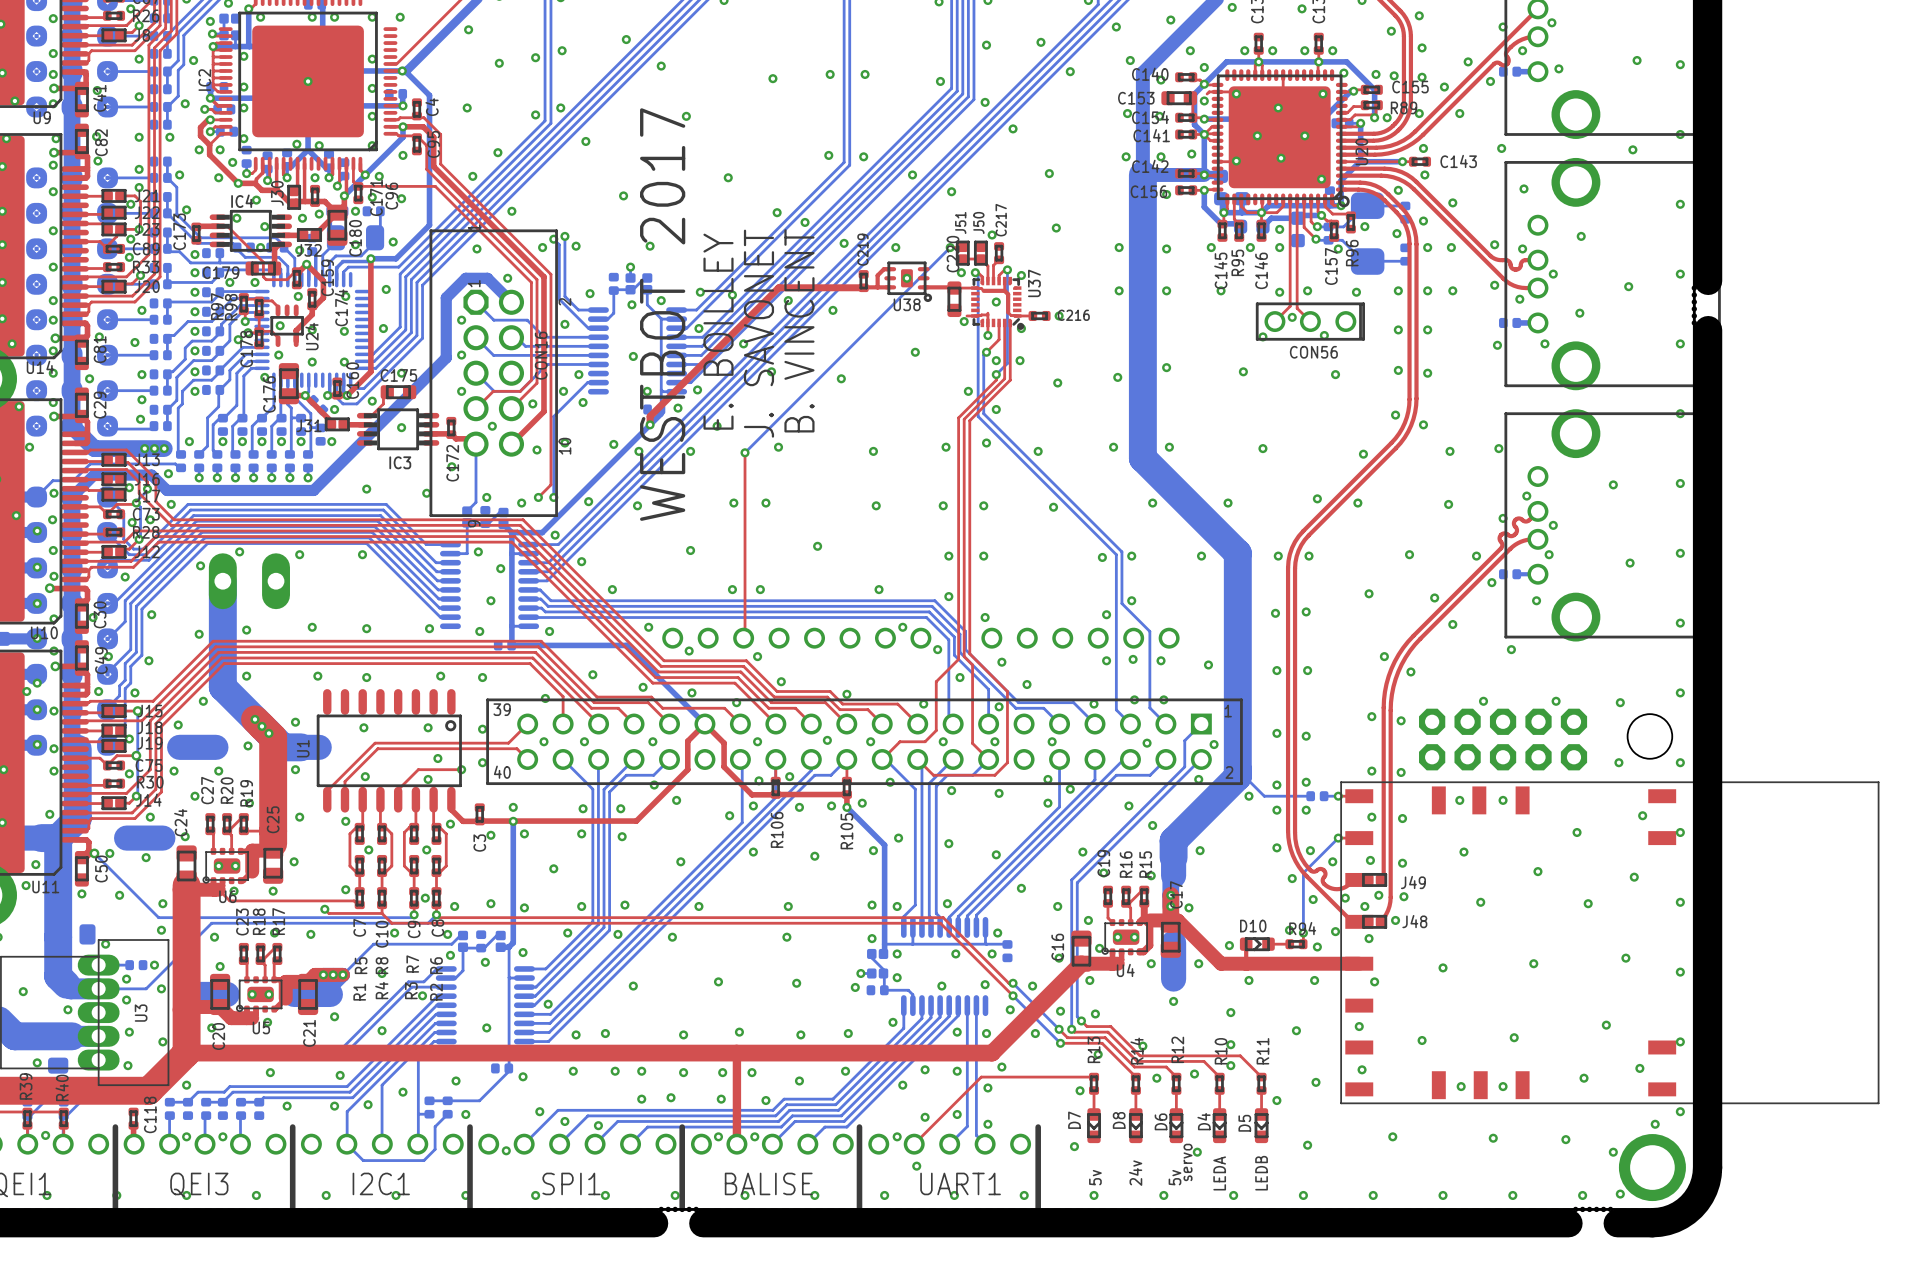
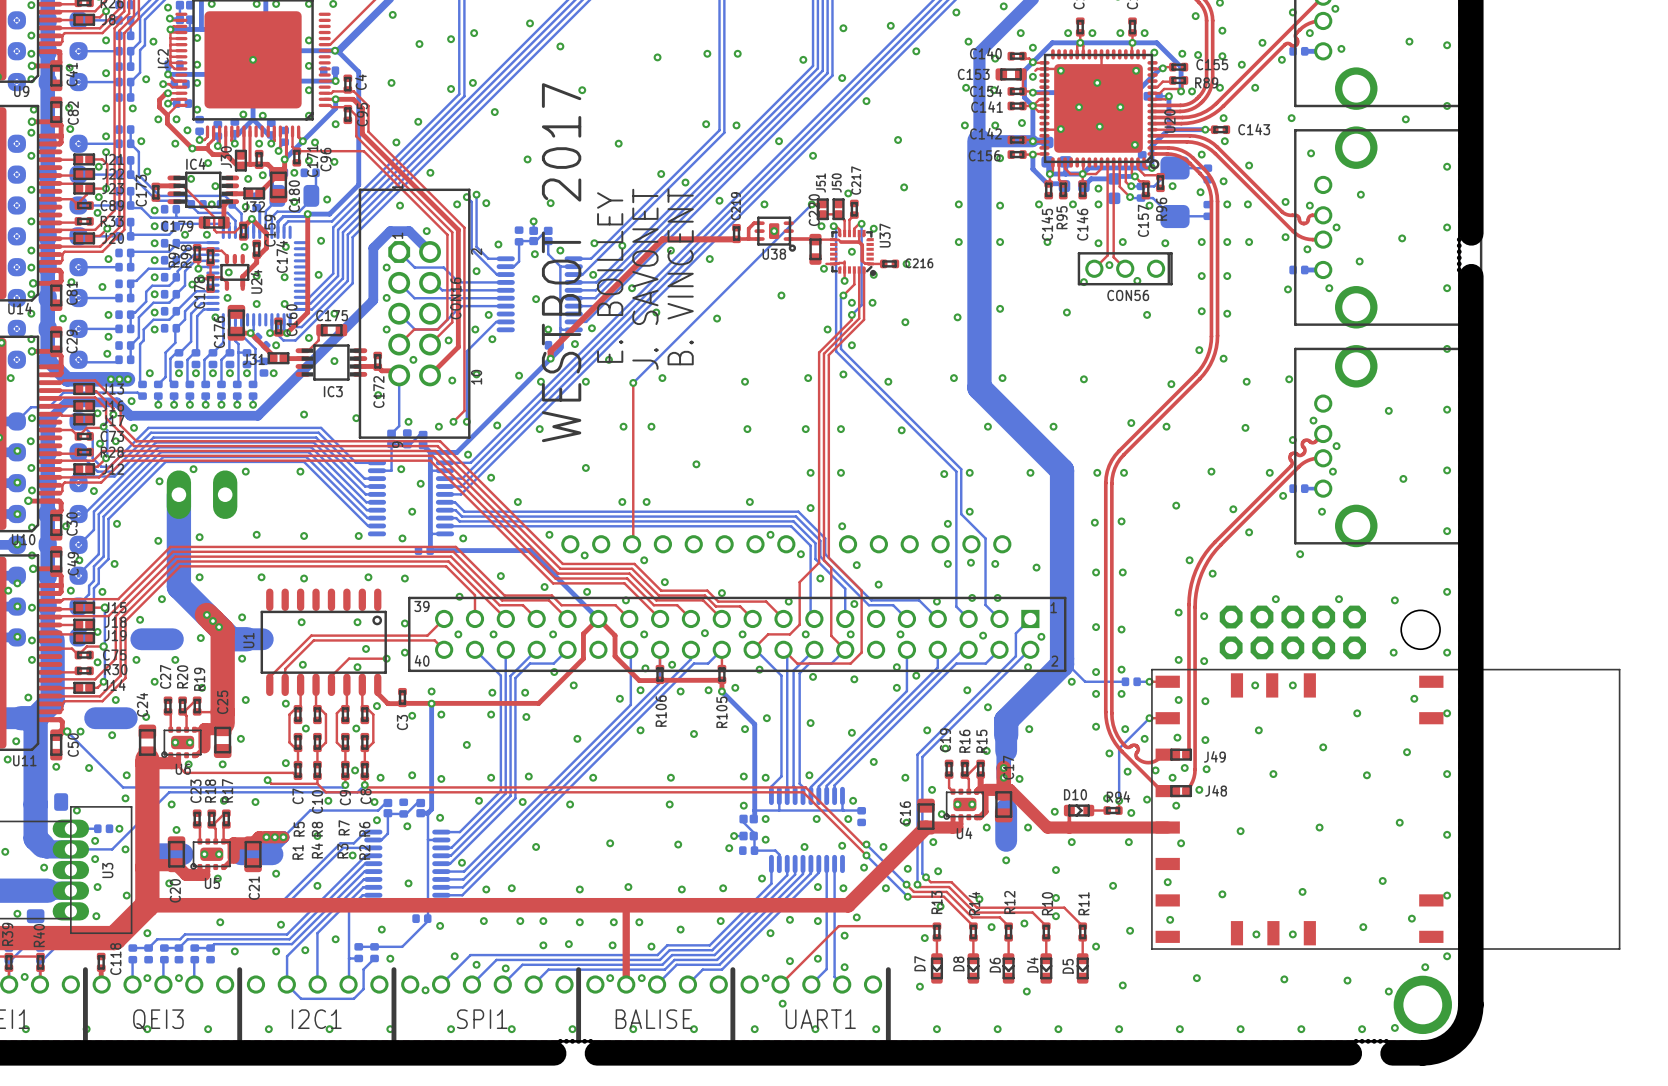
text: servo (1188, 1162) -> none
text: 24v (1135, 1173) -> none
text: LEDA (1219, 1173) -> none
text: LEDB (1261, 1173) -> none
text: 5v (1095, 1177) -> none
text: 5v (1174, 1177) -> none

